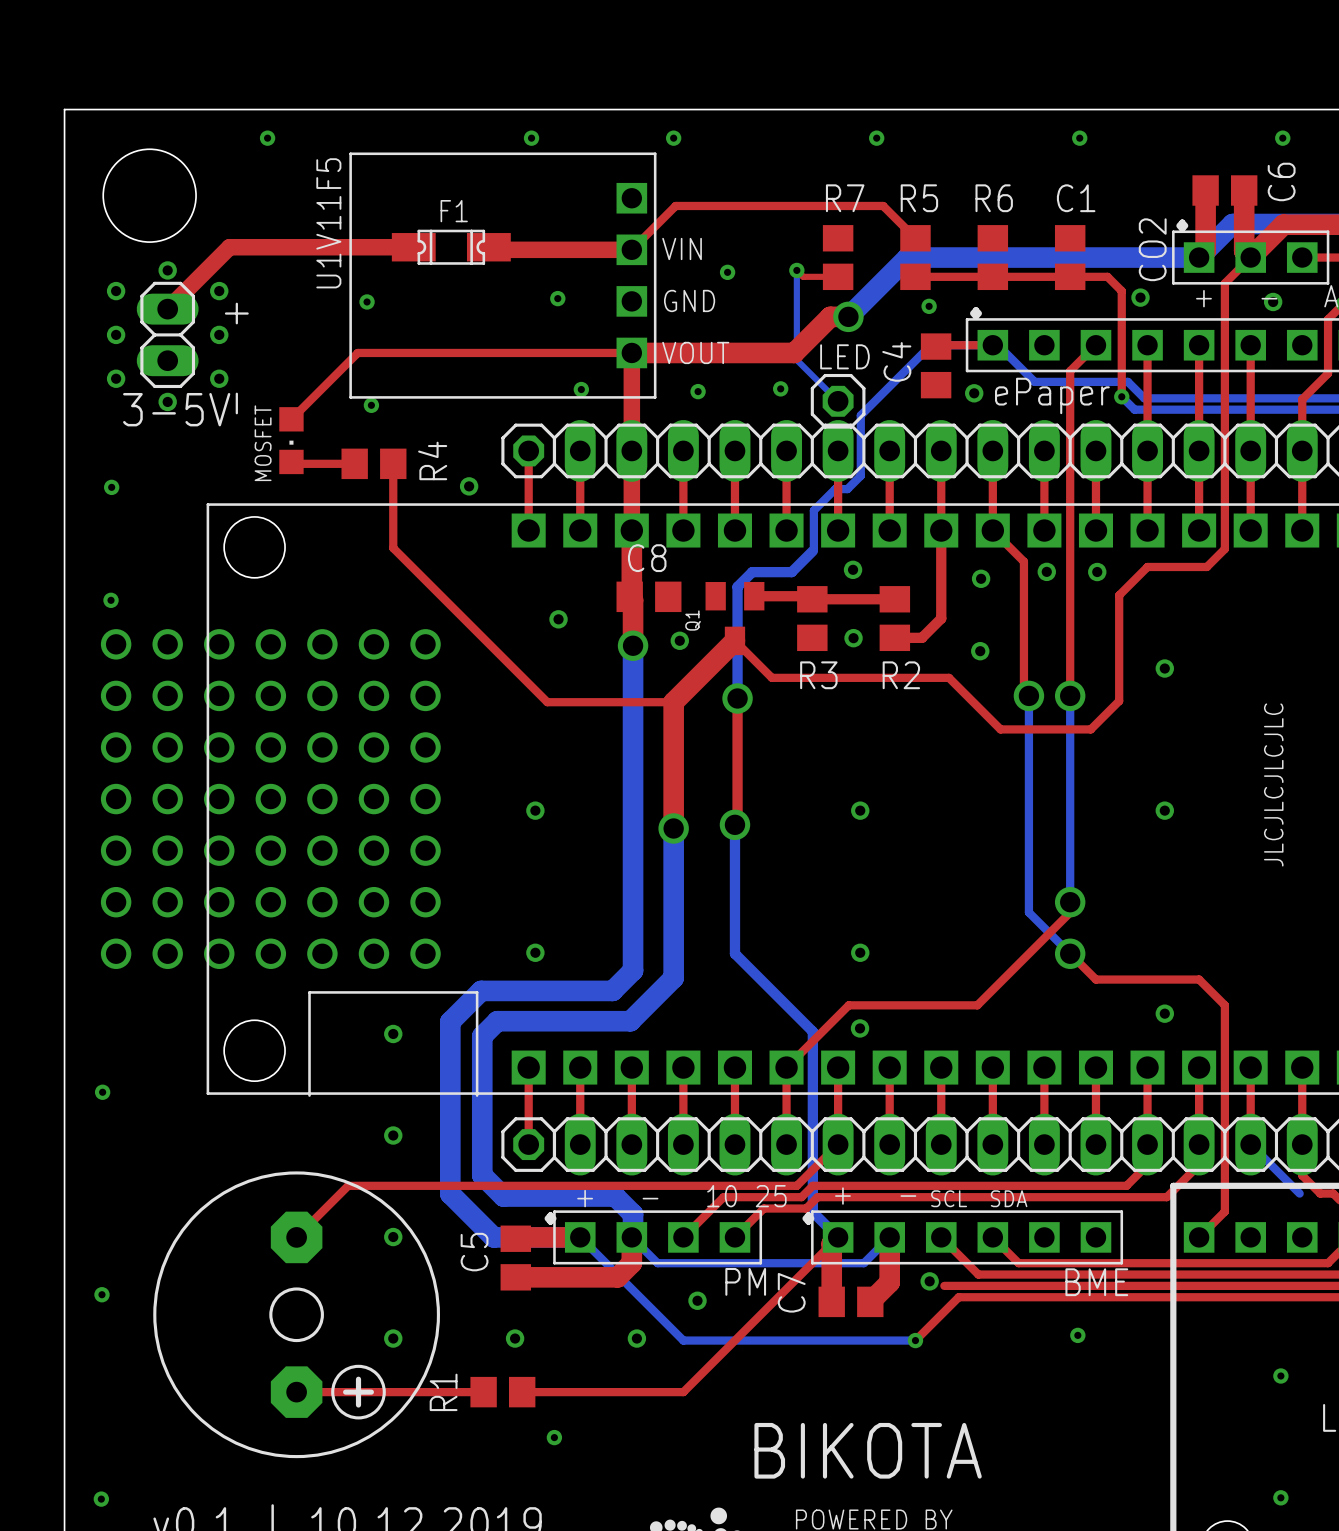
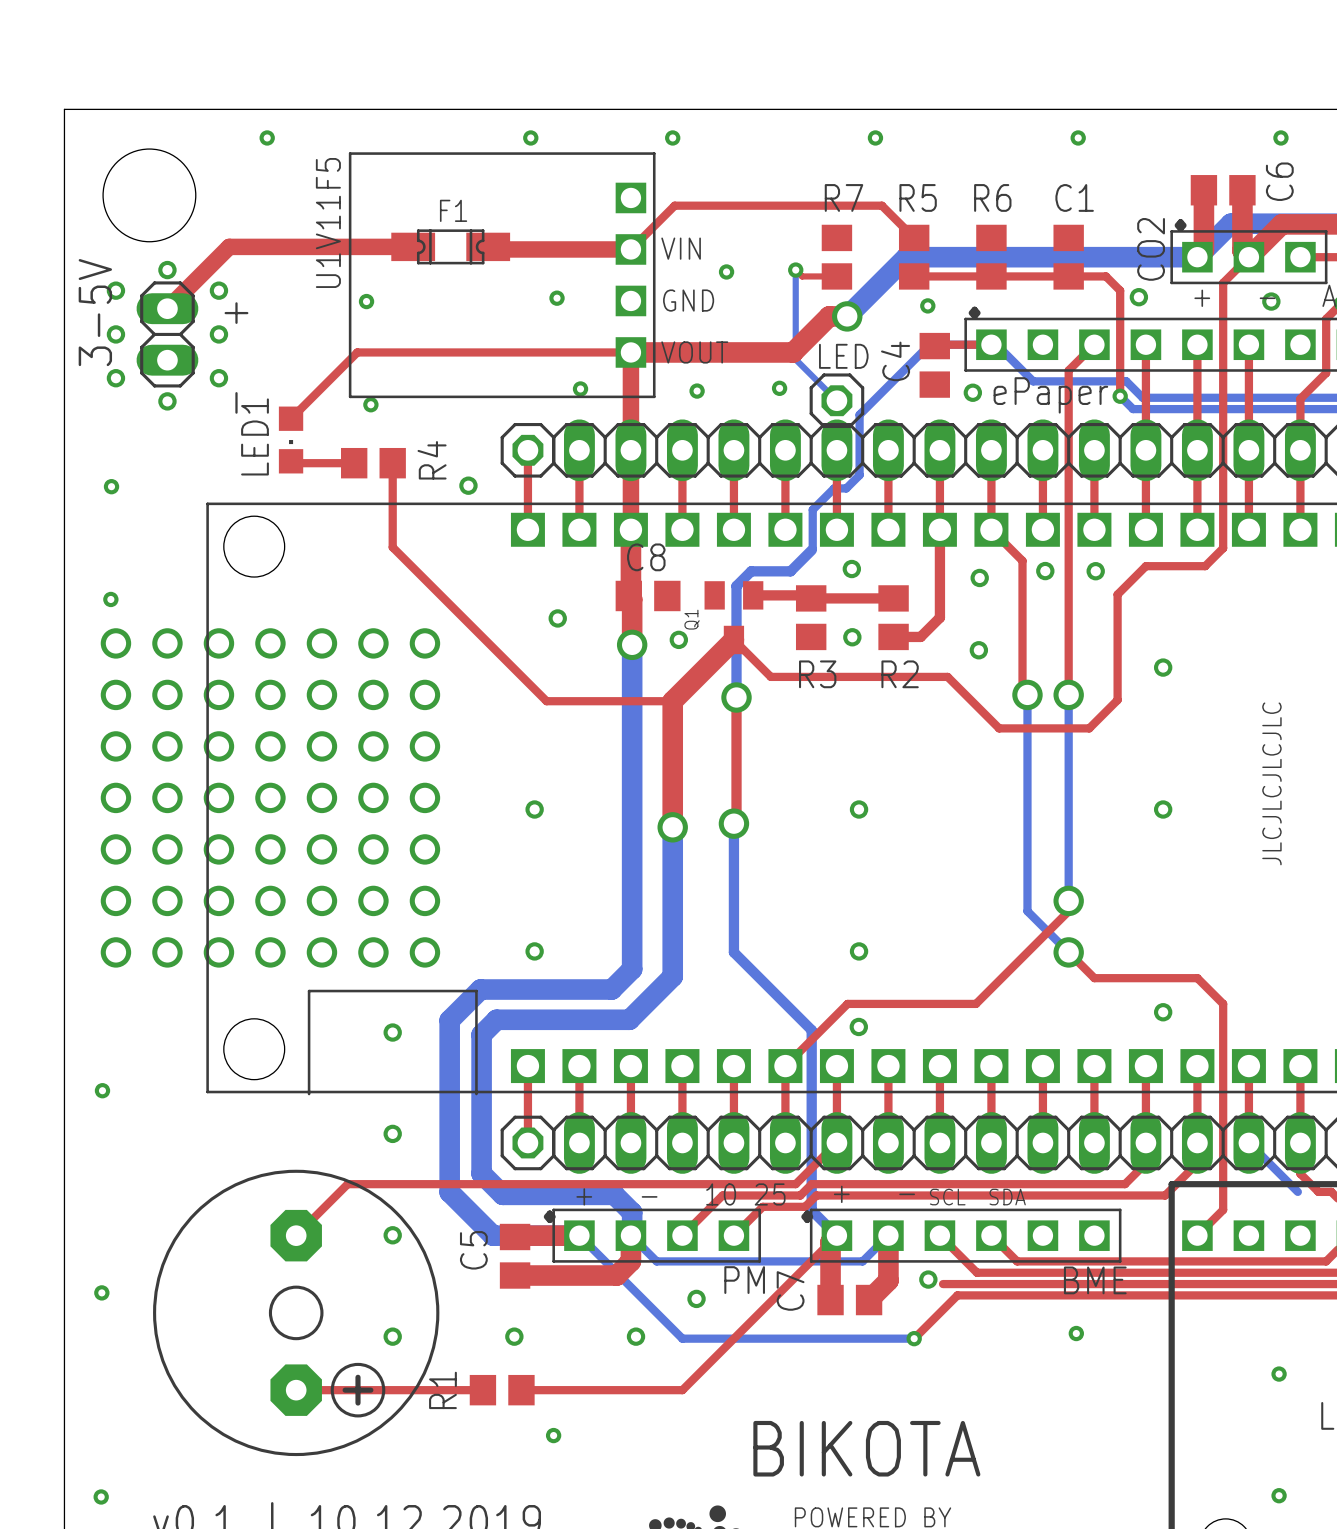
text rotation: 0° (176, 409) -> 90° counterclockwise (95, 312)
text position: 3-5V (176, 409) -> 3-5V (95, 312)
MOSFET name: MOSFET (263, 443) -> LED1 (255, 436)

